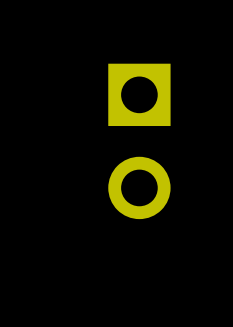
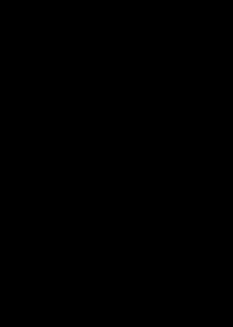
part: (139, 141) -> none

